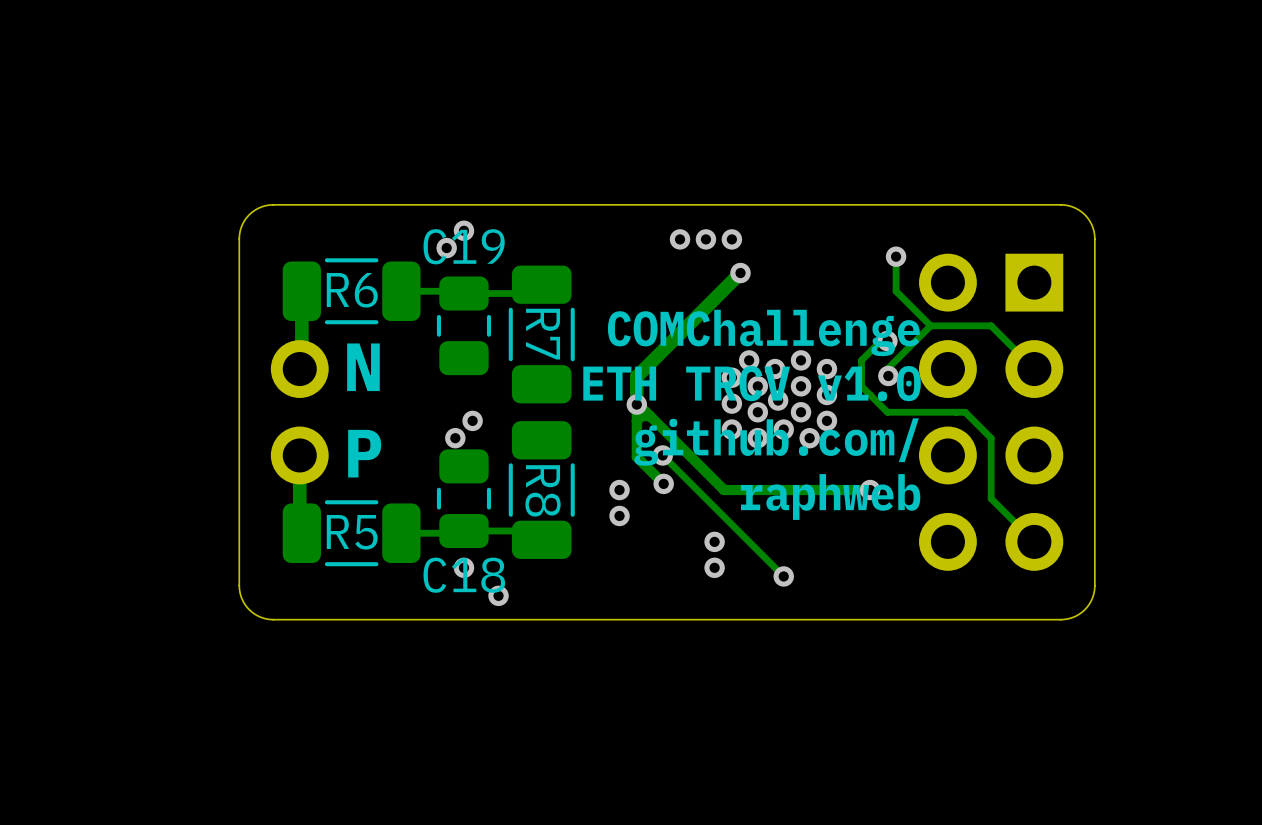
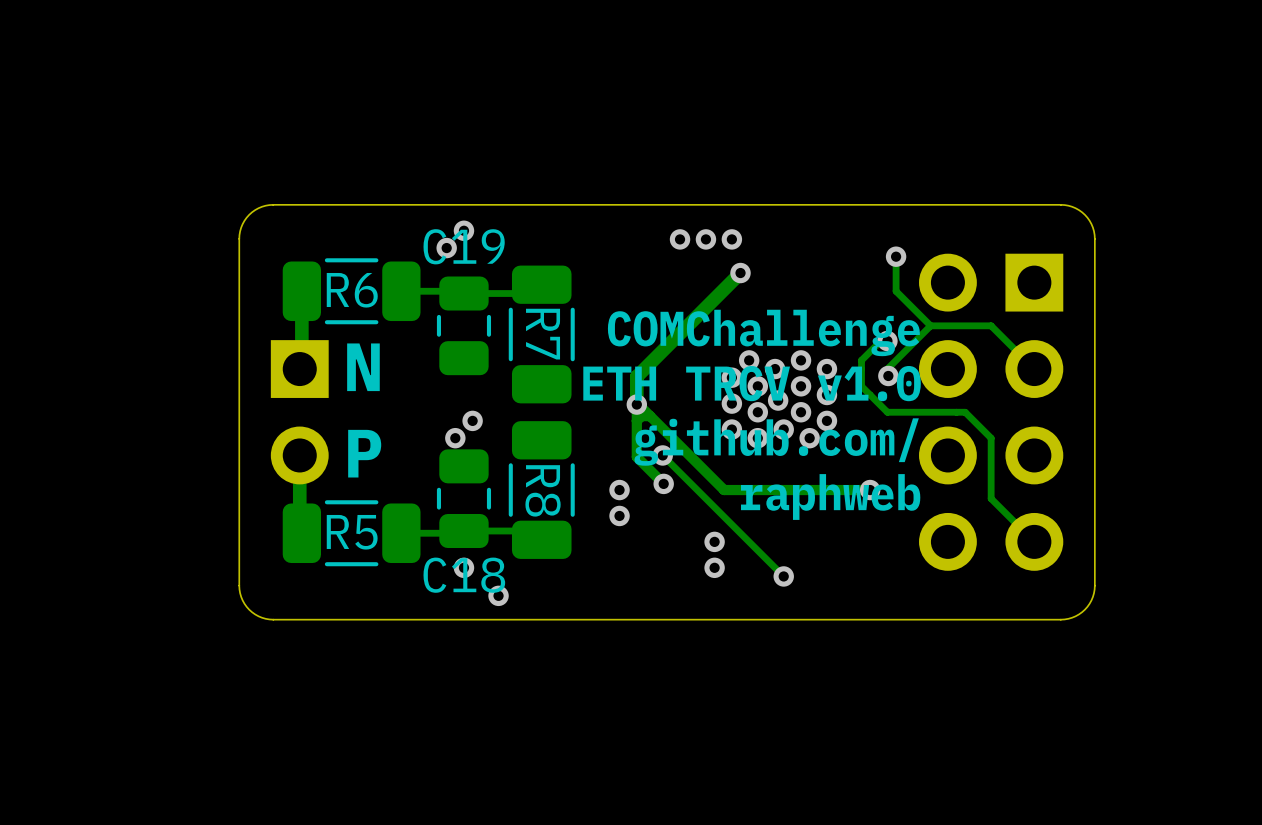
part footprint: [270, 340, 329, 485] -> [270, 340, 329, 485]

